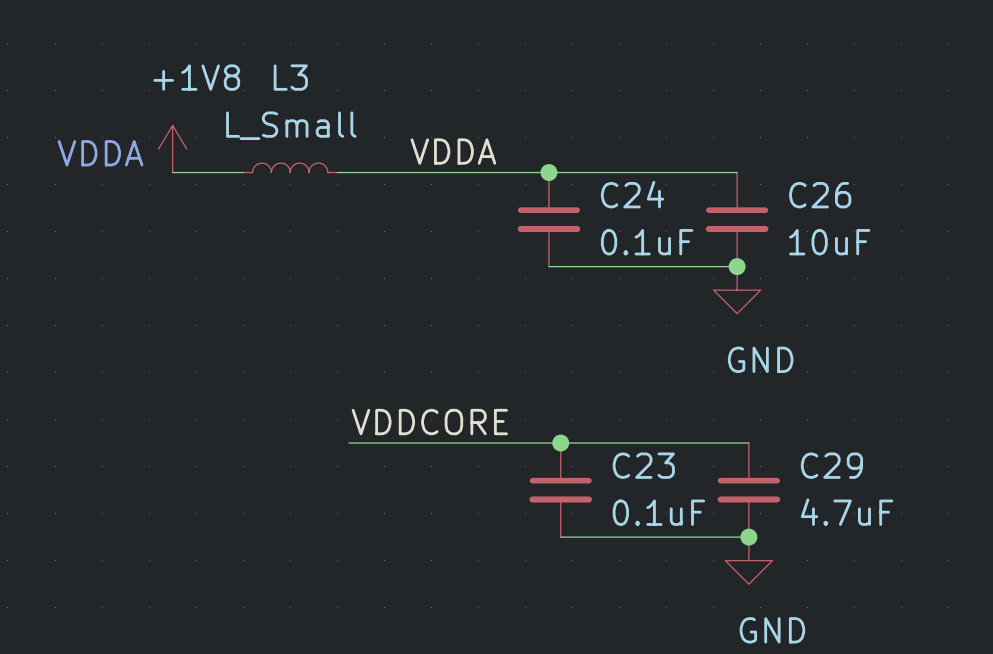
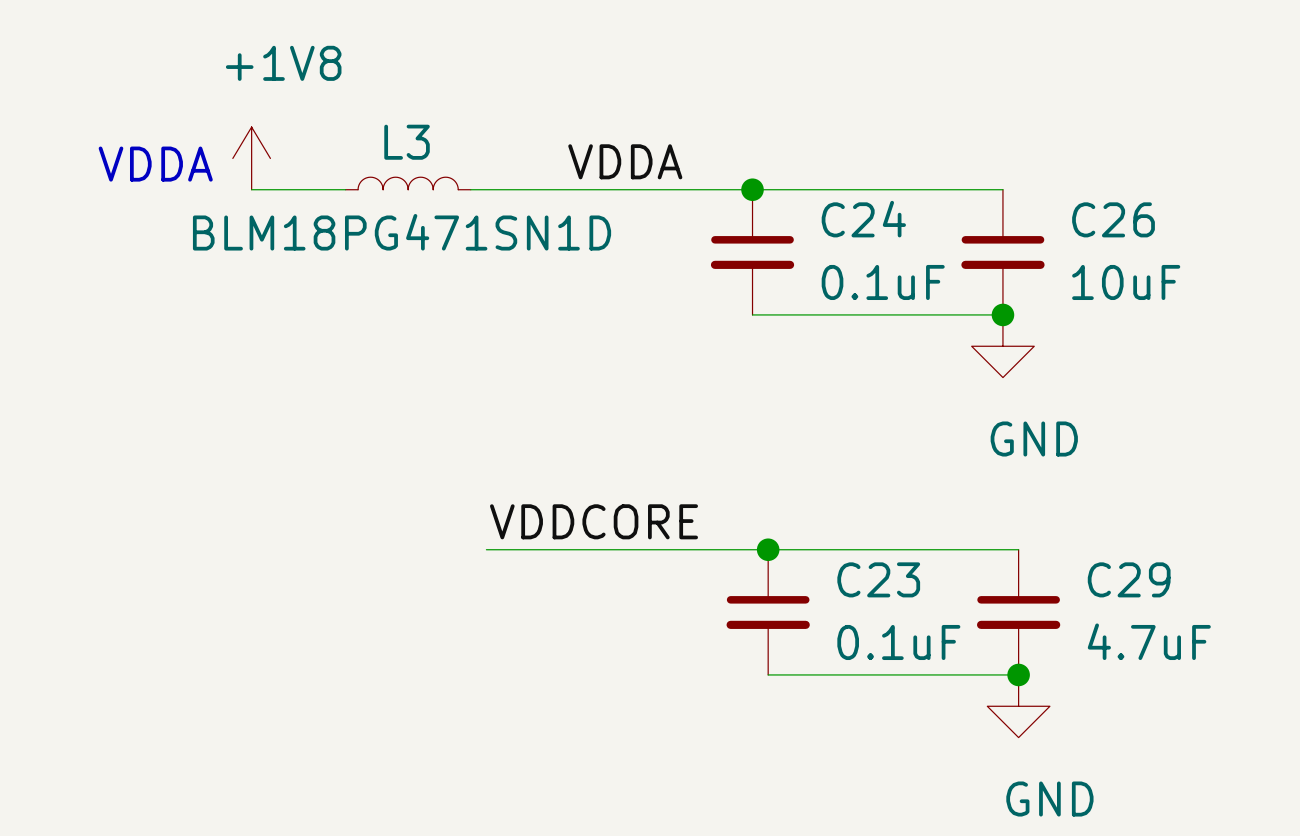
L3 name position: L3 (290, 77) -> L3 (407, 142)
L3 value: L_Small (291, 125) -> BLM18PG471SN1D (402, 232)

